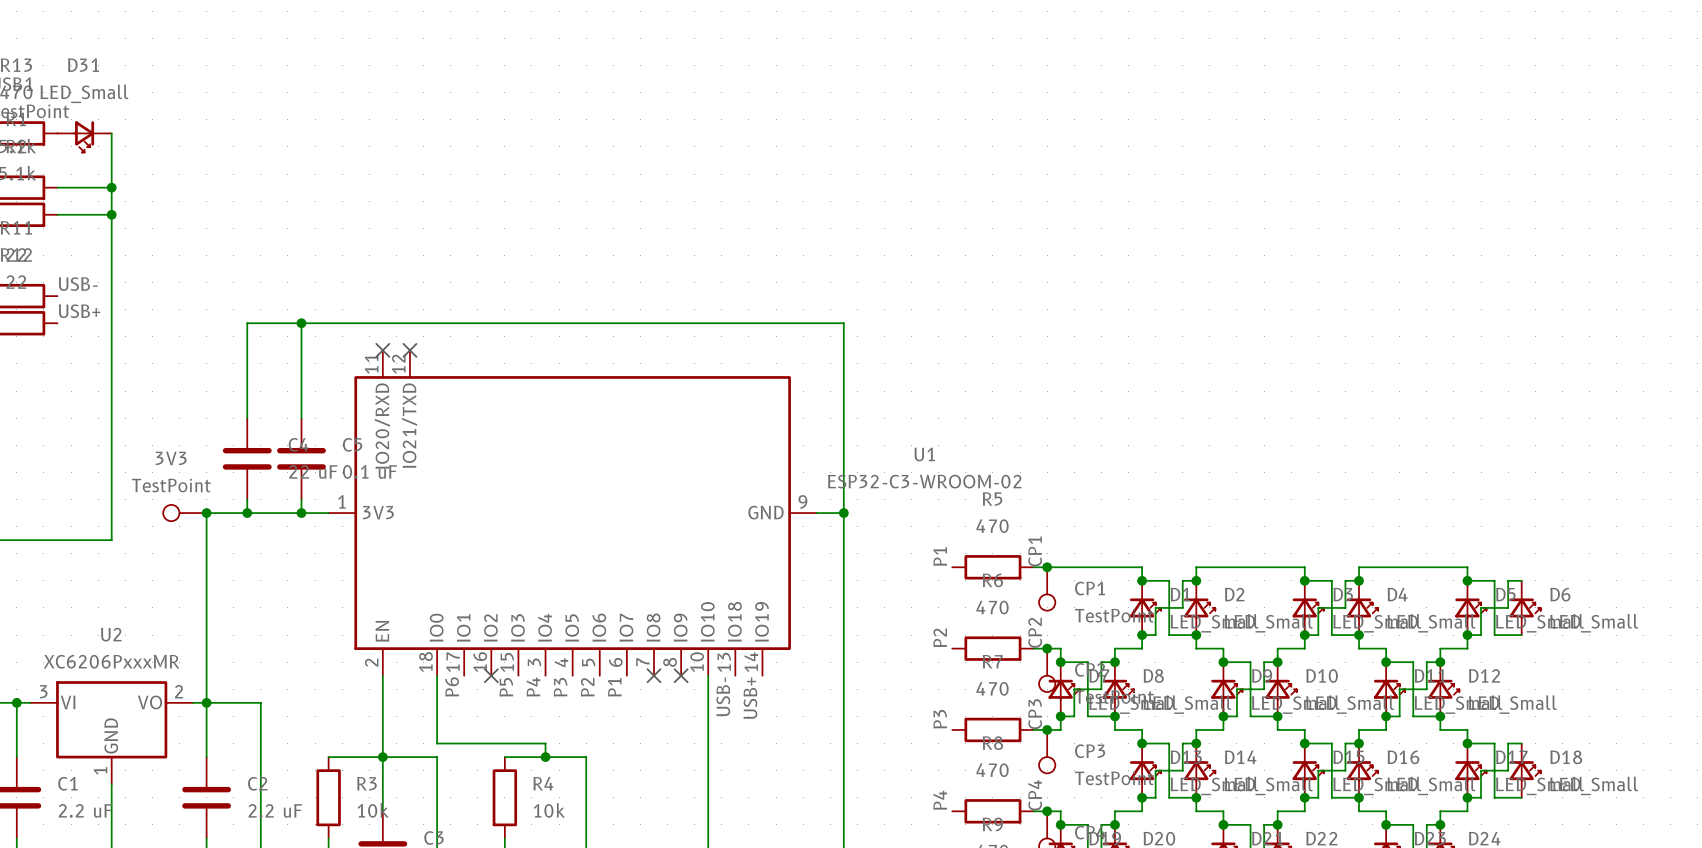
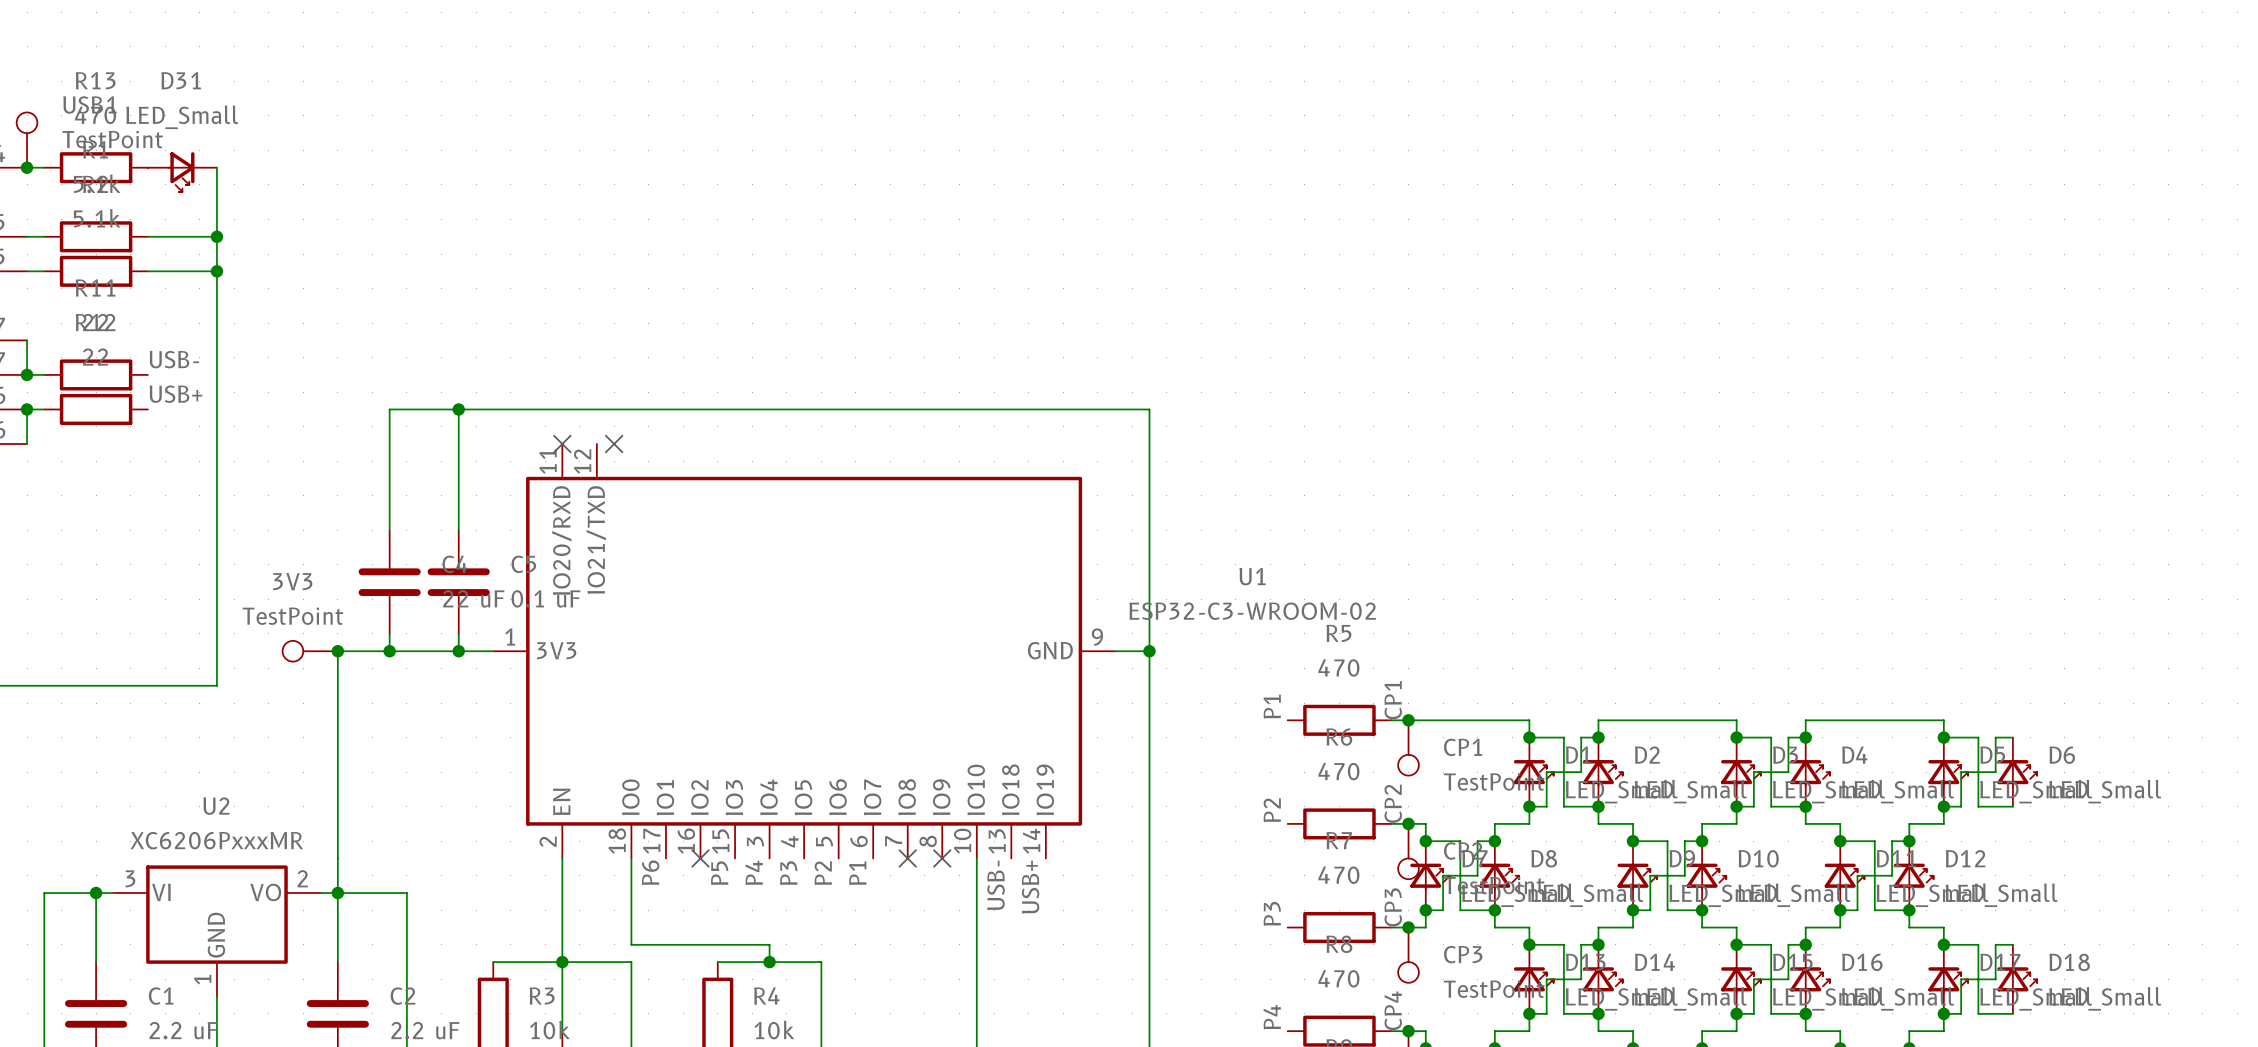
no-connect mark position: (409, 350) -> (614, 444)

